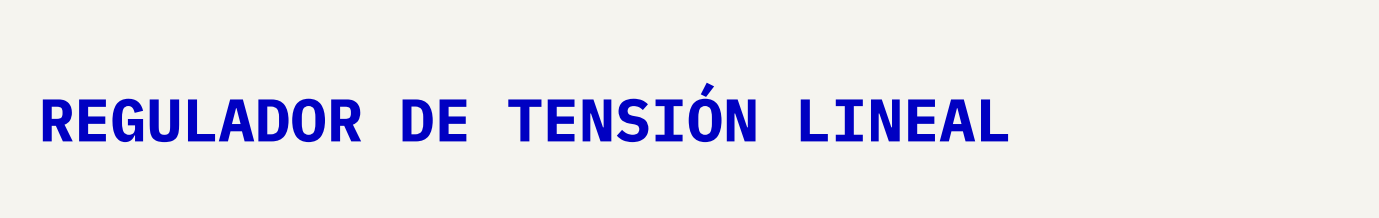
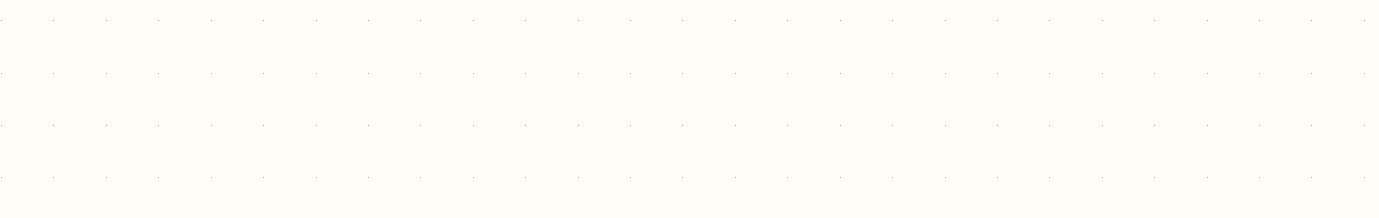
text: REGULADOR DE TENSIÓN LINEAL (525, 112) -> none

